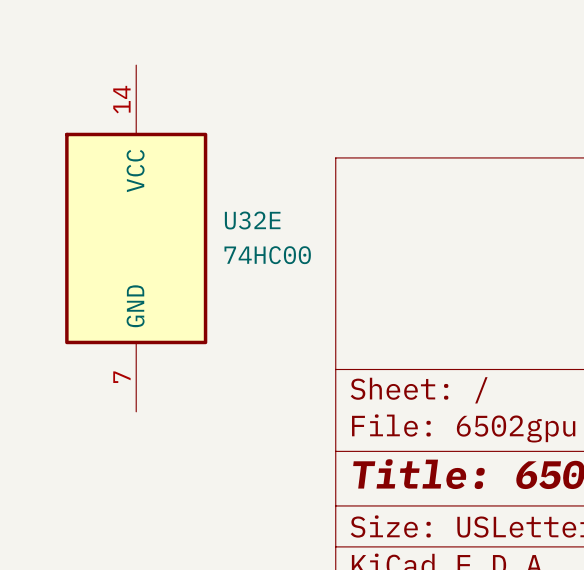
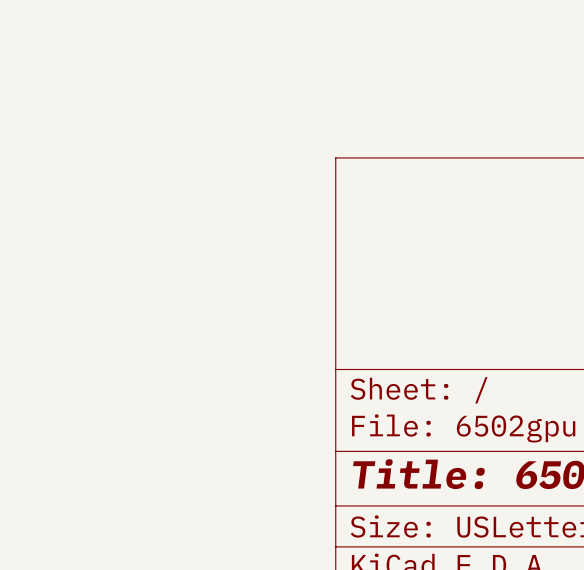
U32E: 74HC00 (136, 238) -> none

